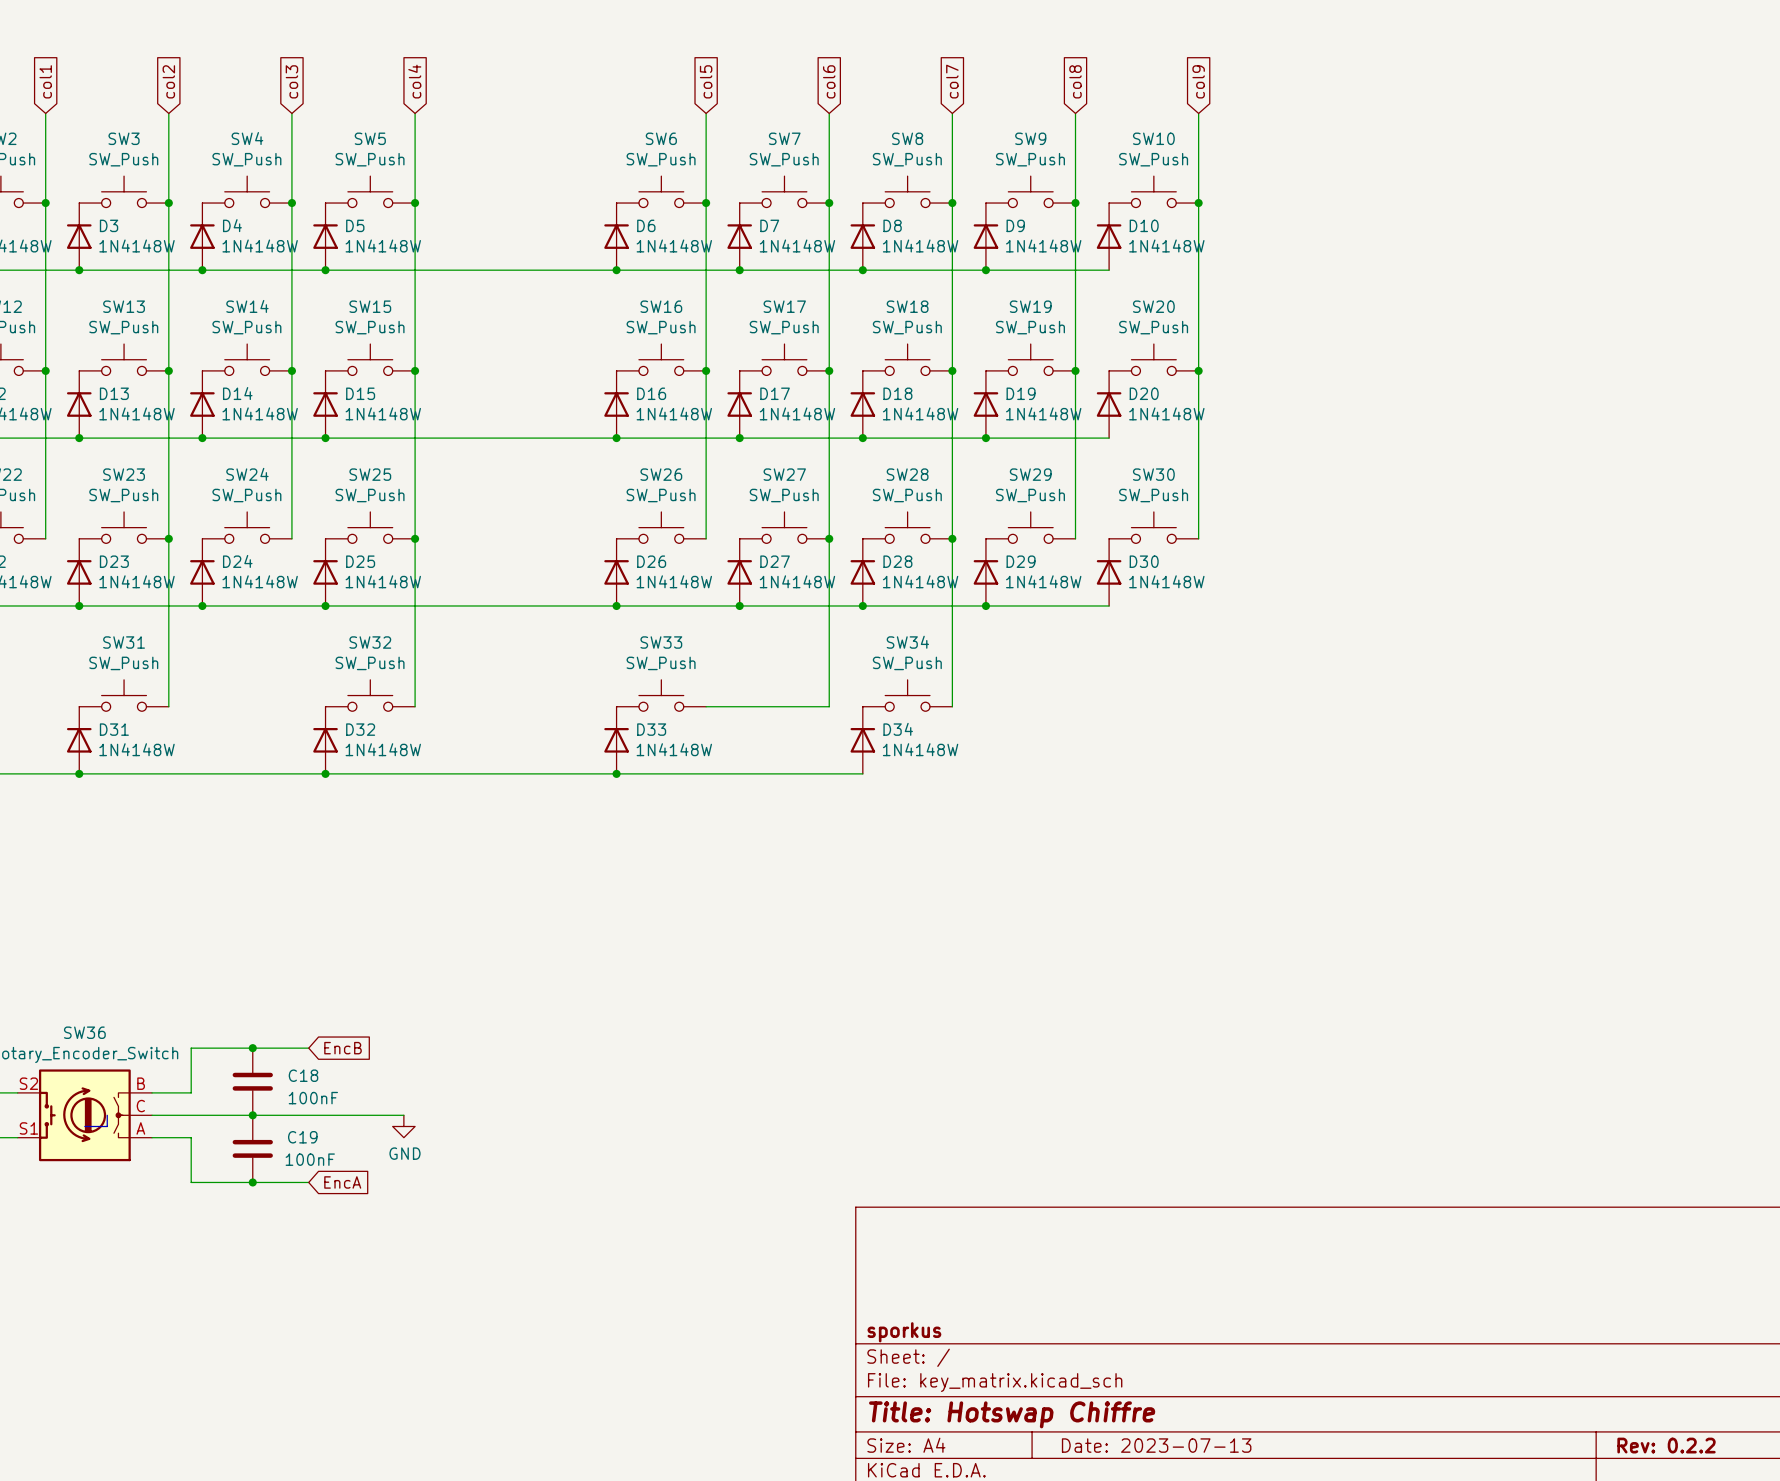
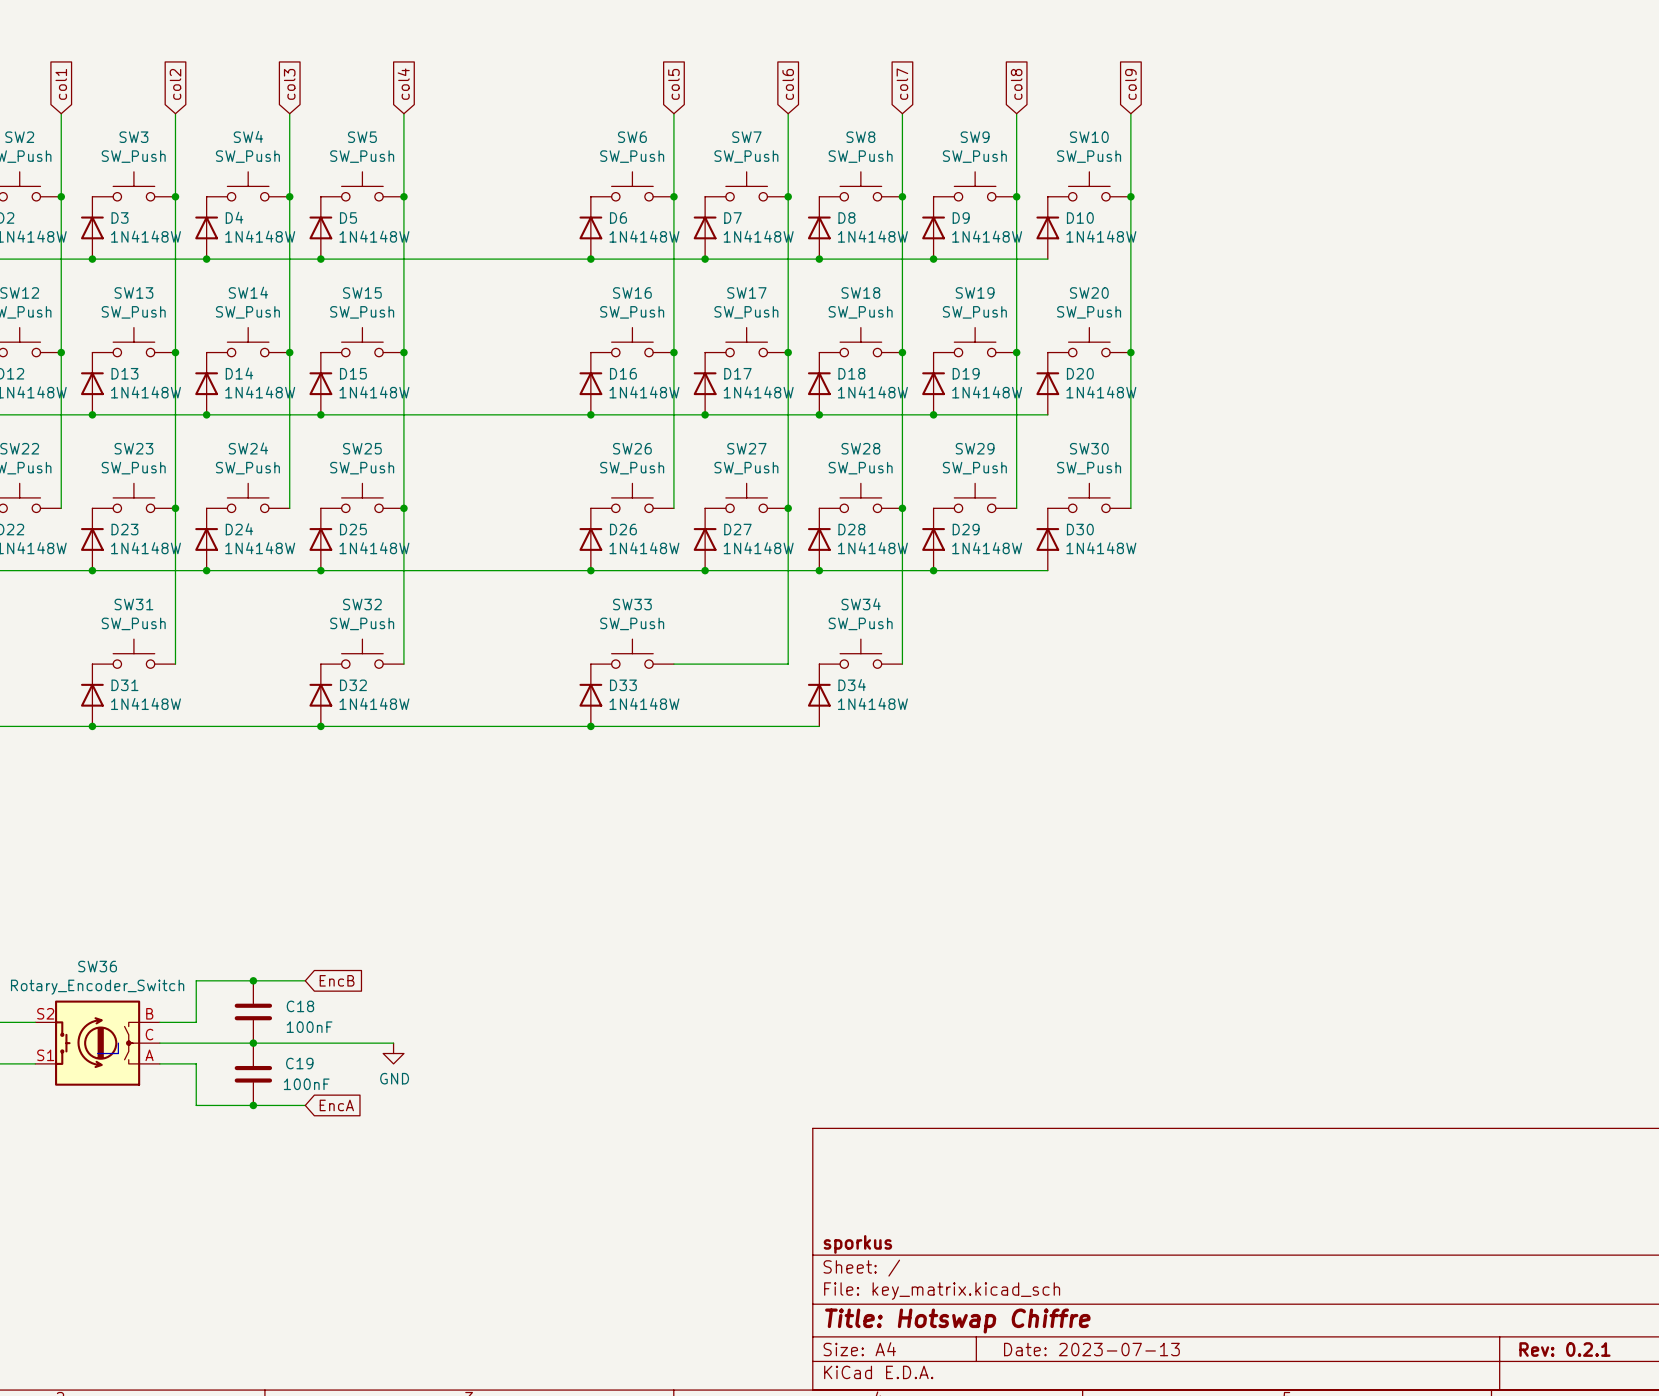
title block: Rev: 0.2.2 (1666, 1445) -> Rev: 0.2.1 (1564, 1349)

